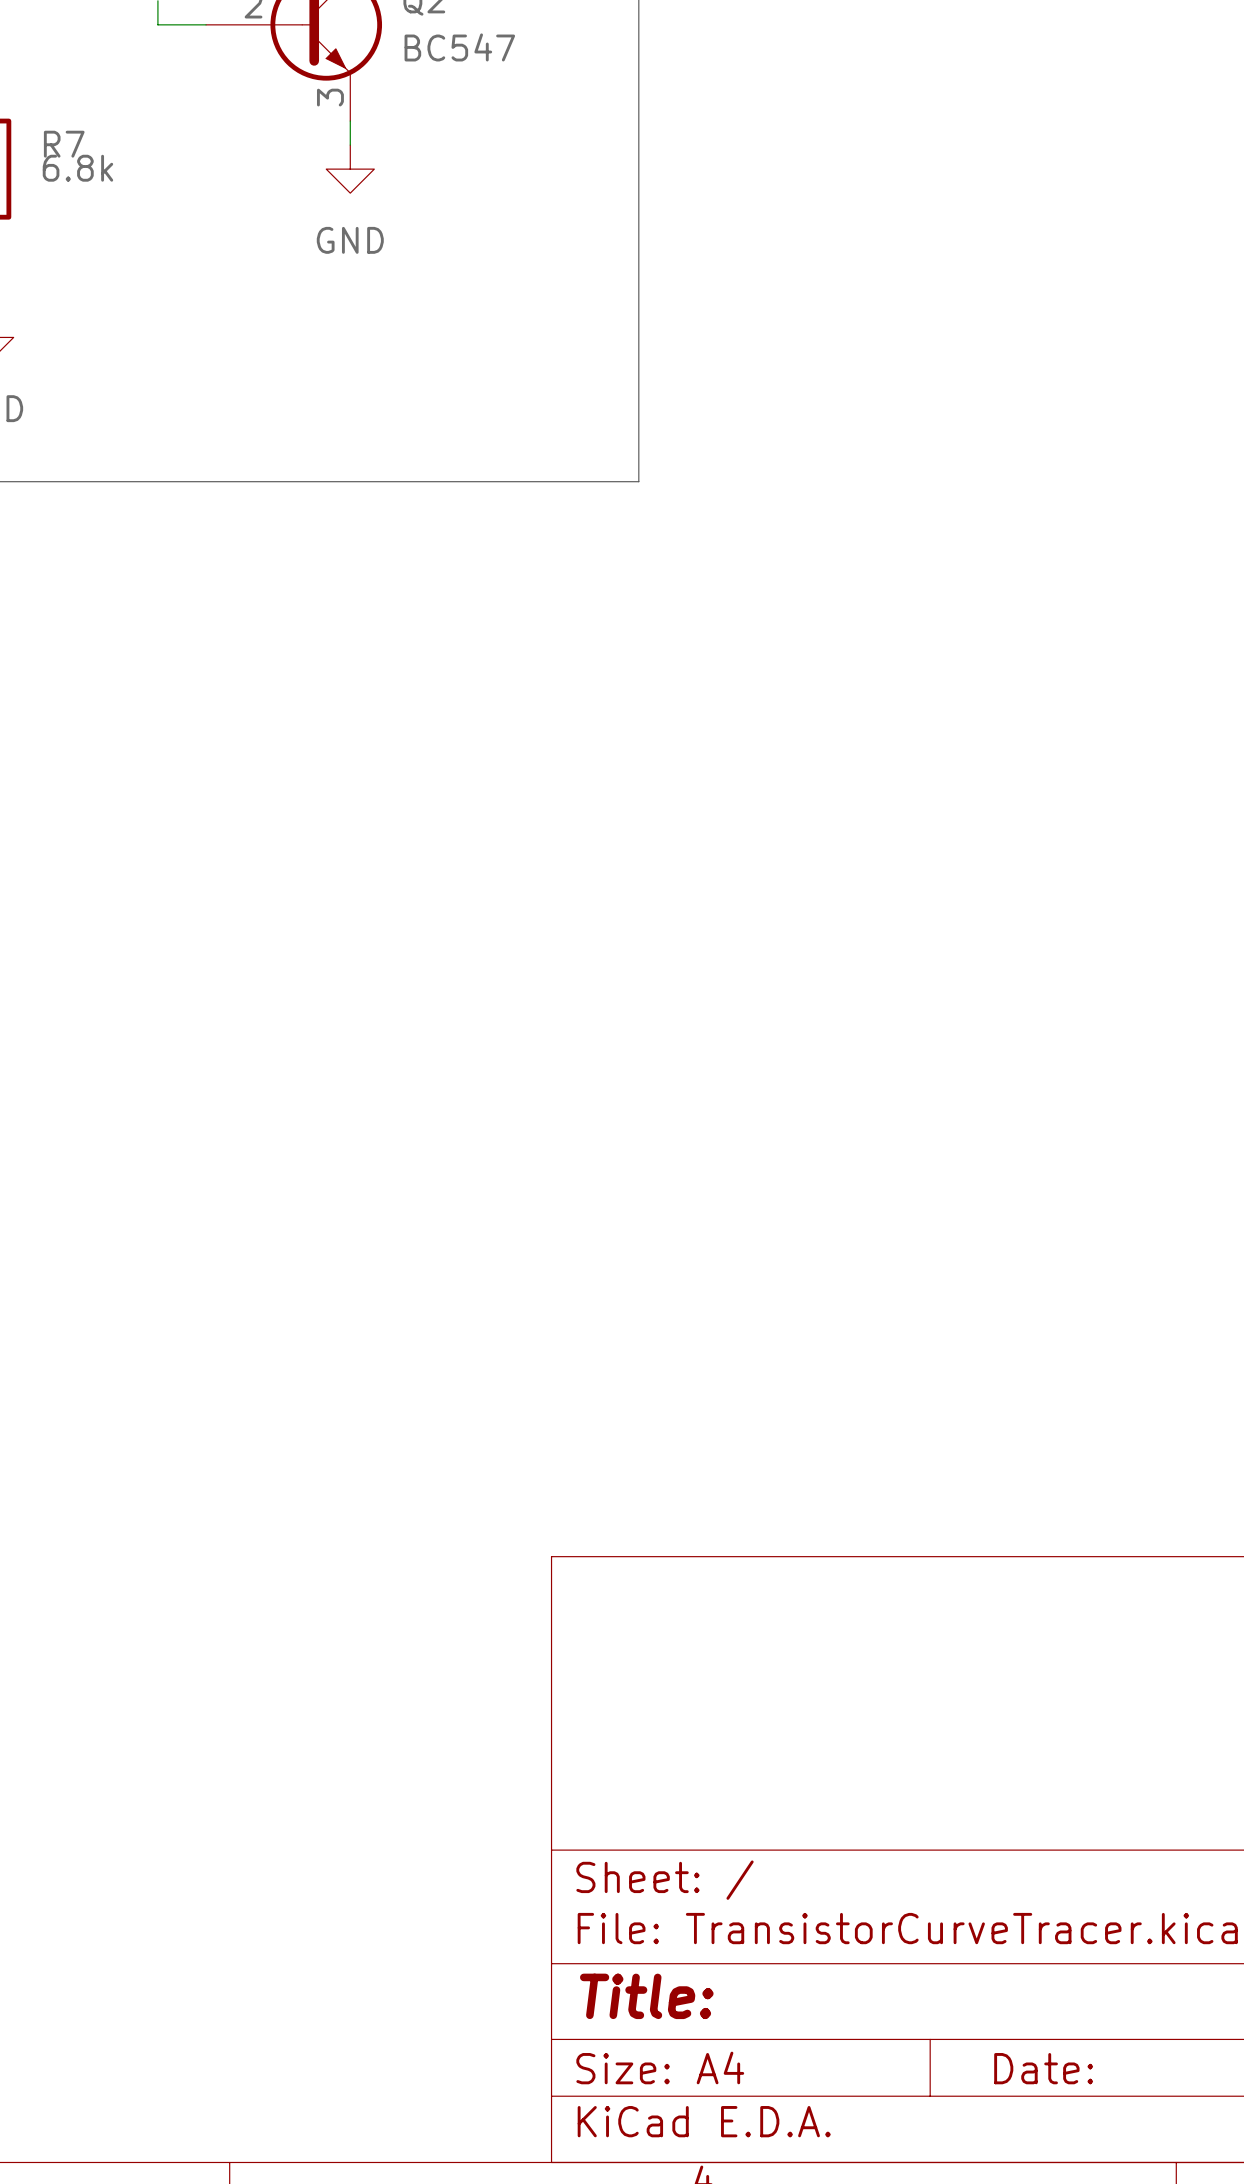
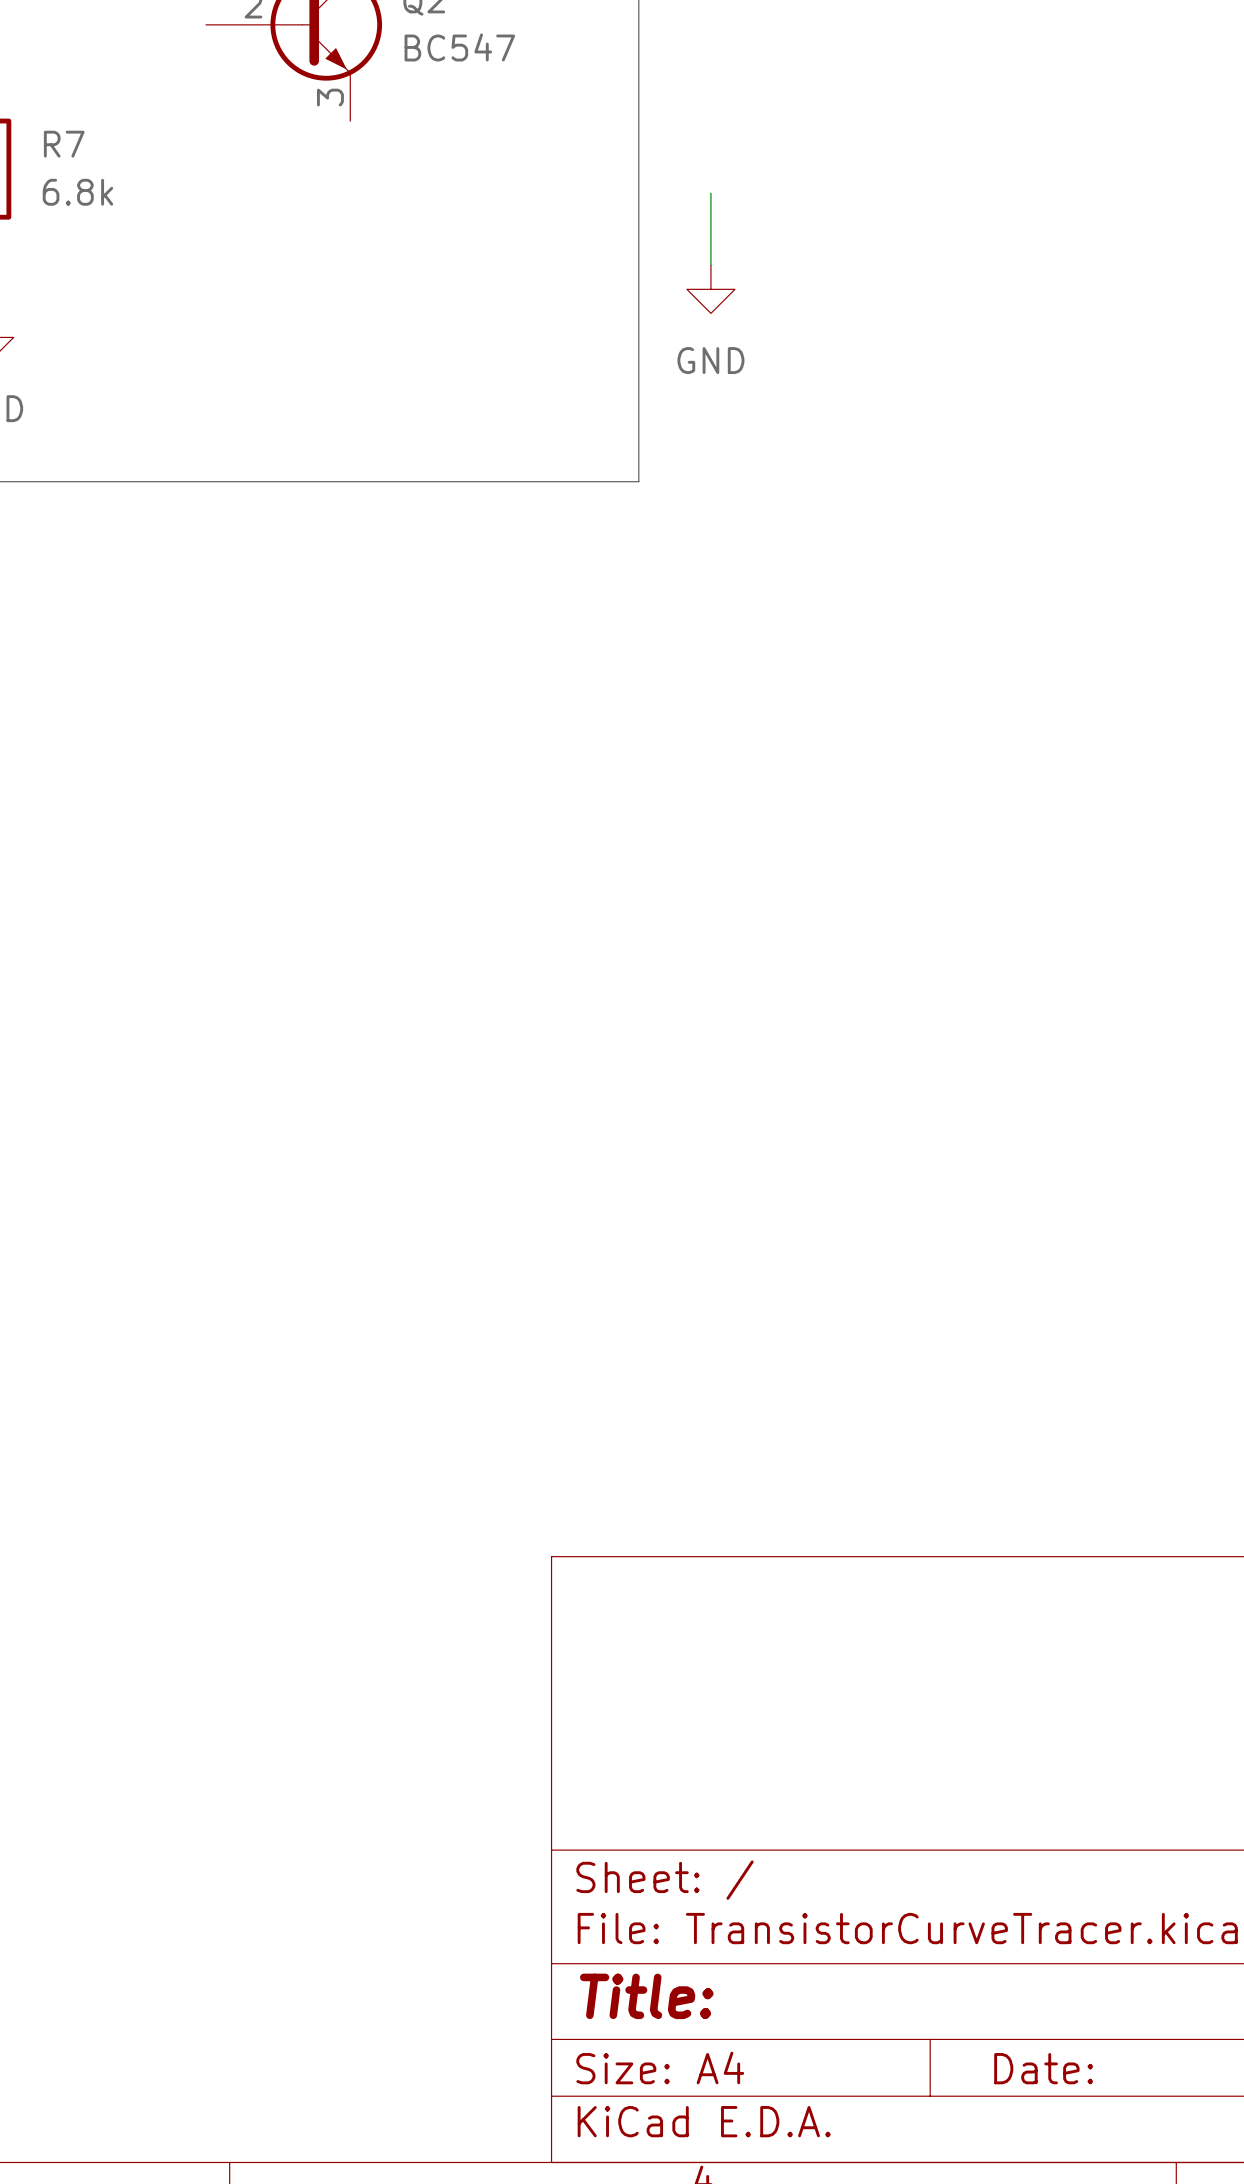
wire: (157, 0) (157, 24) (206, 24) -> none
wire: (350, 121) (350, 145) -> none
R7 value position: 6.8k (77, 168) -> 6.8k (77, 192)
power symbol: GND (350, 169) -> none
wire: none -> (710, 193) (710, 265)
power symbol: none -> GND (710, 289)

